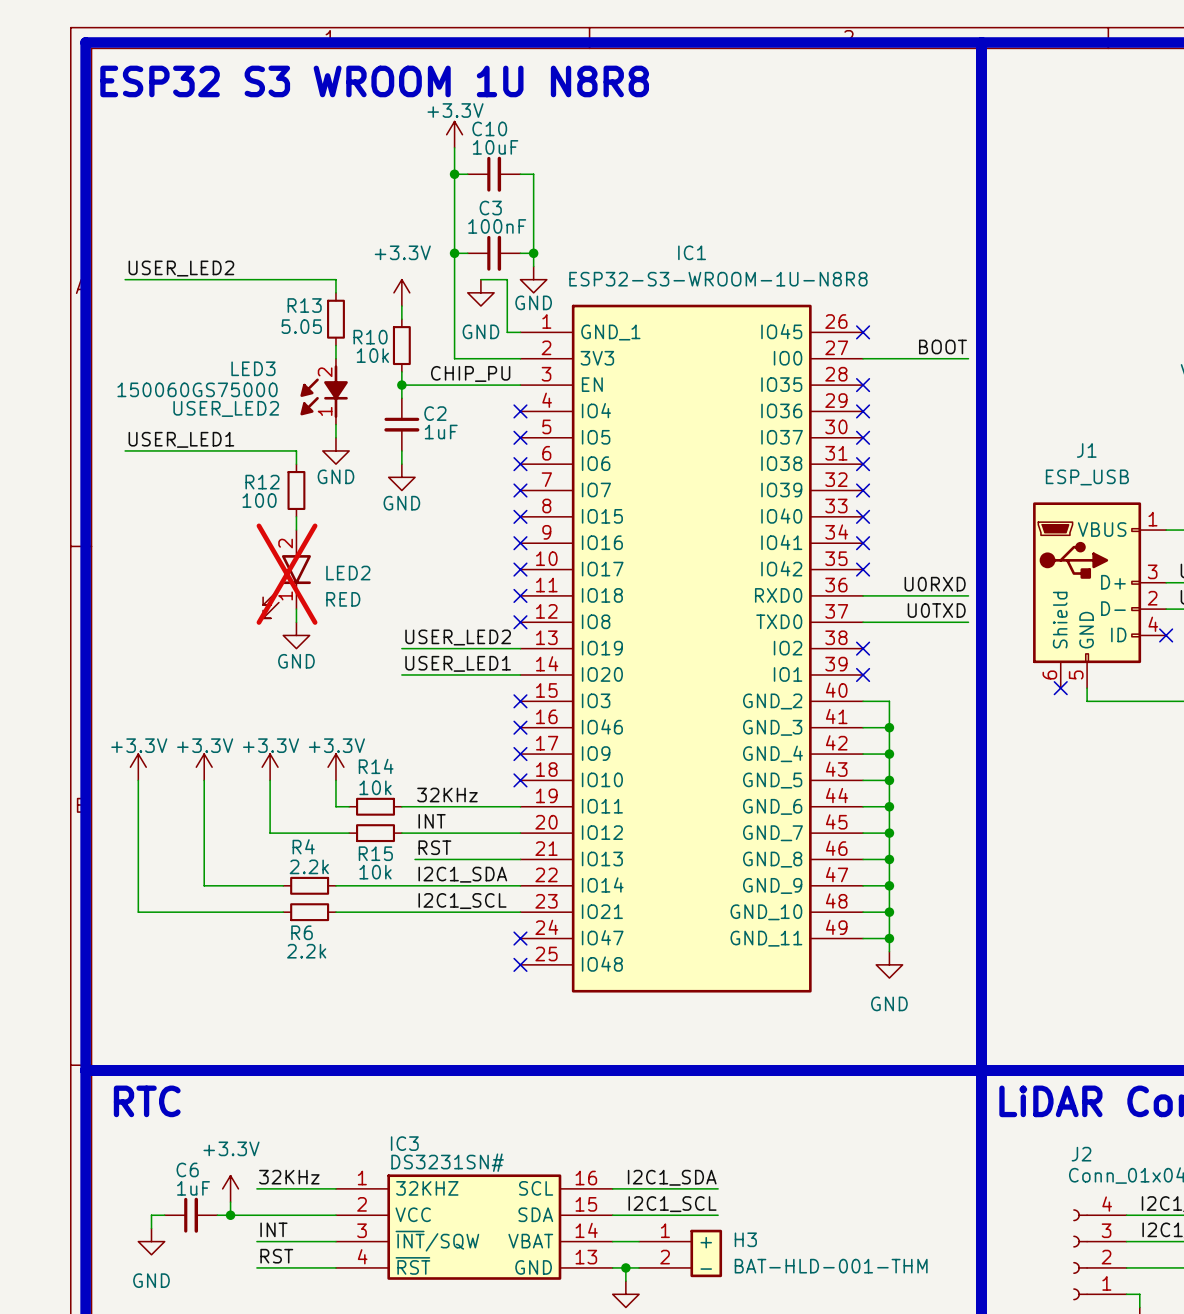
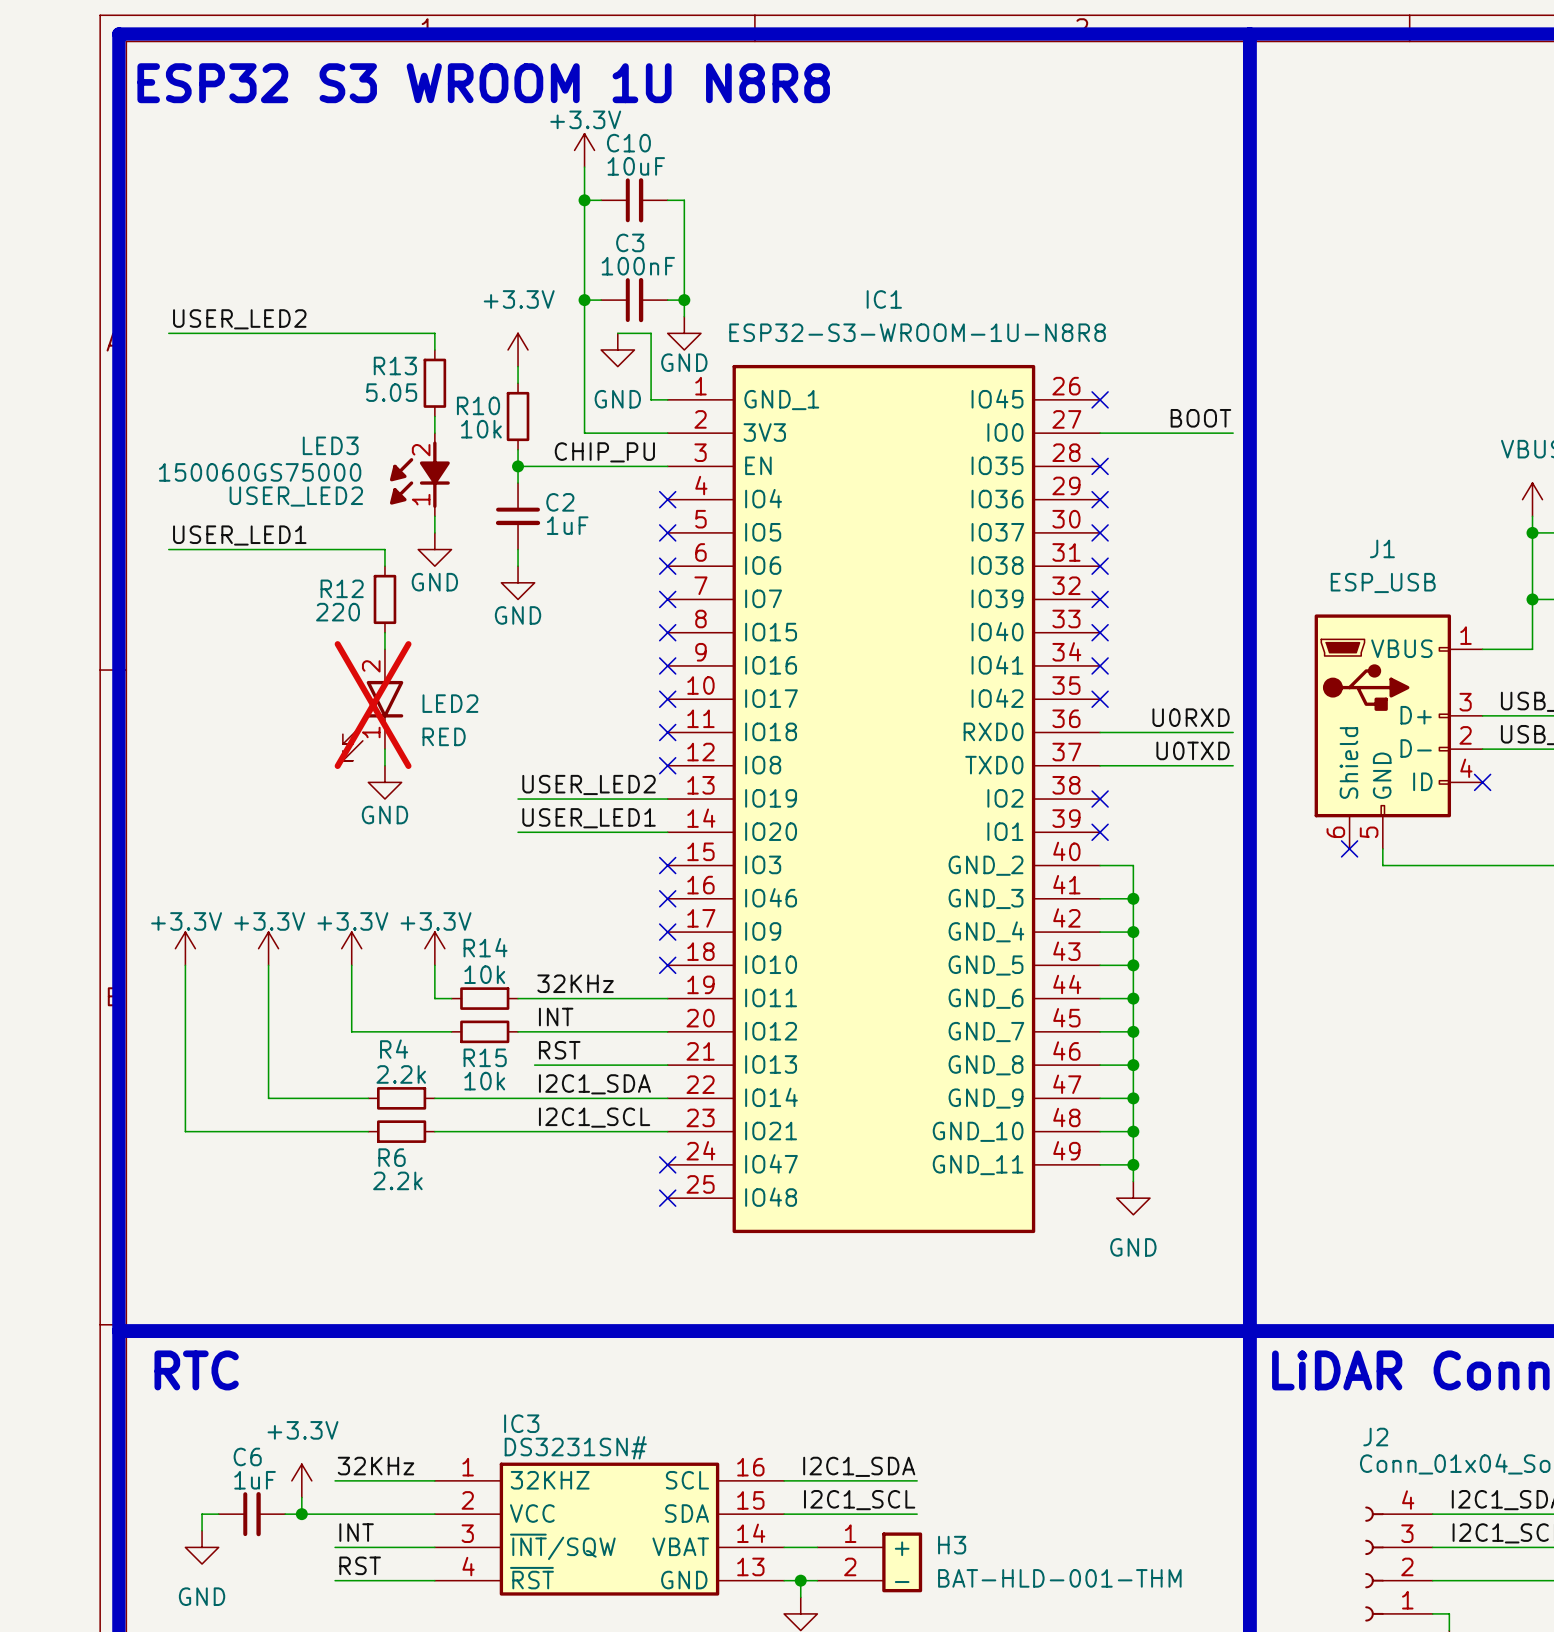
R12 value: 100 (259, 500) -> 220 (338, 612)

